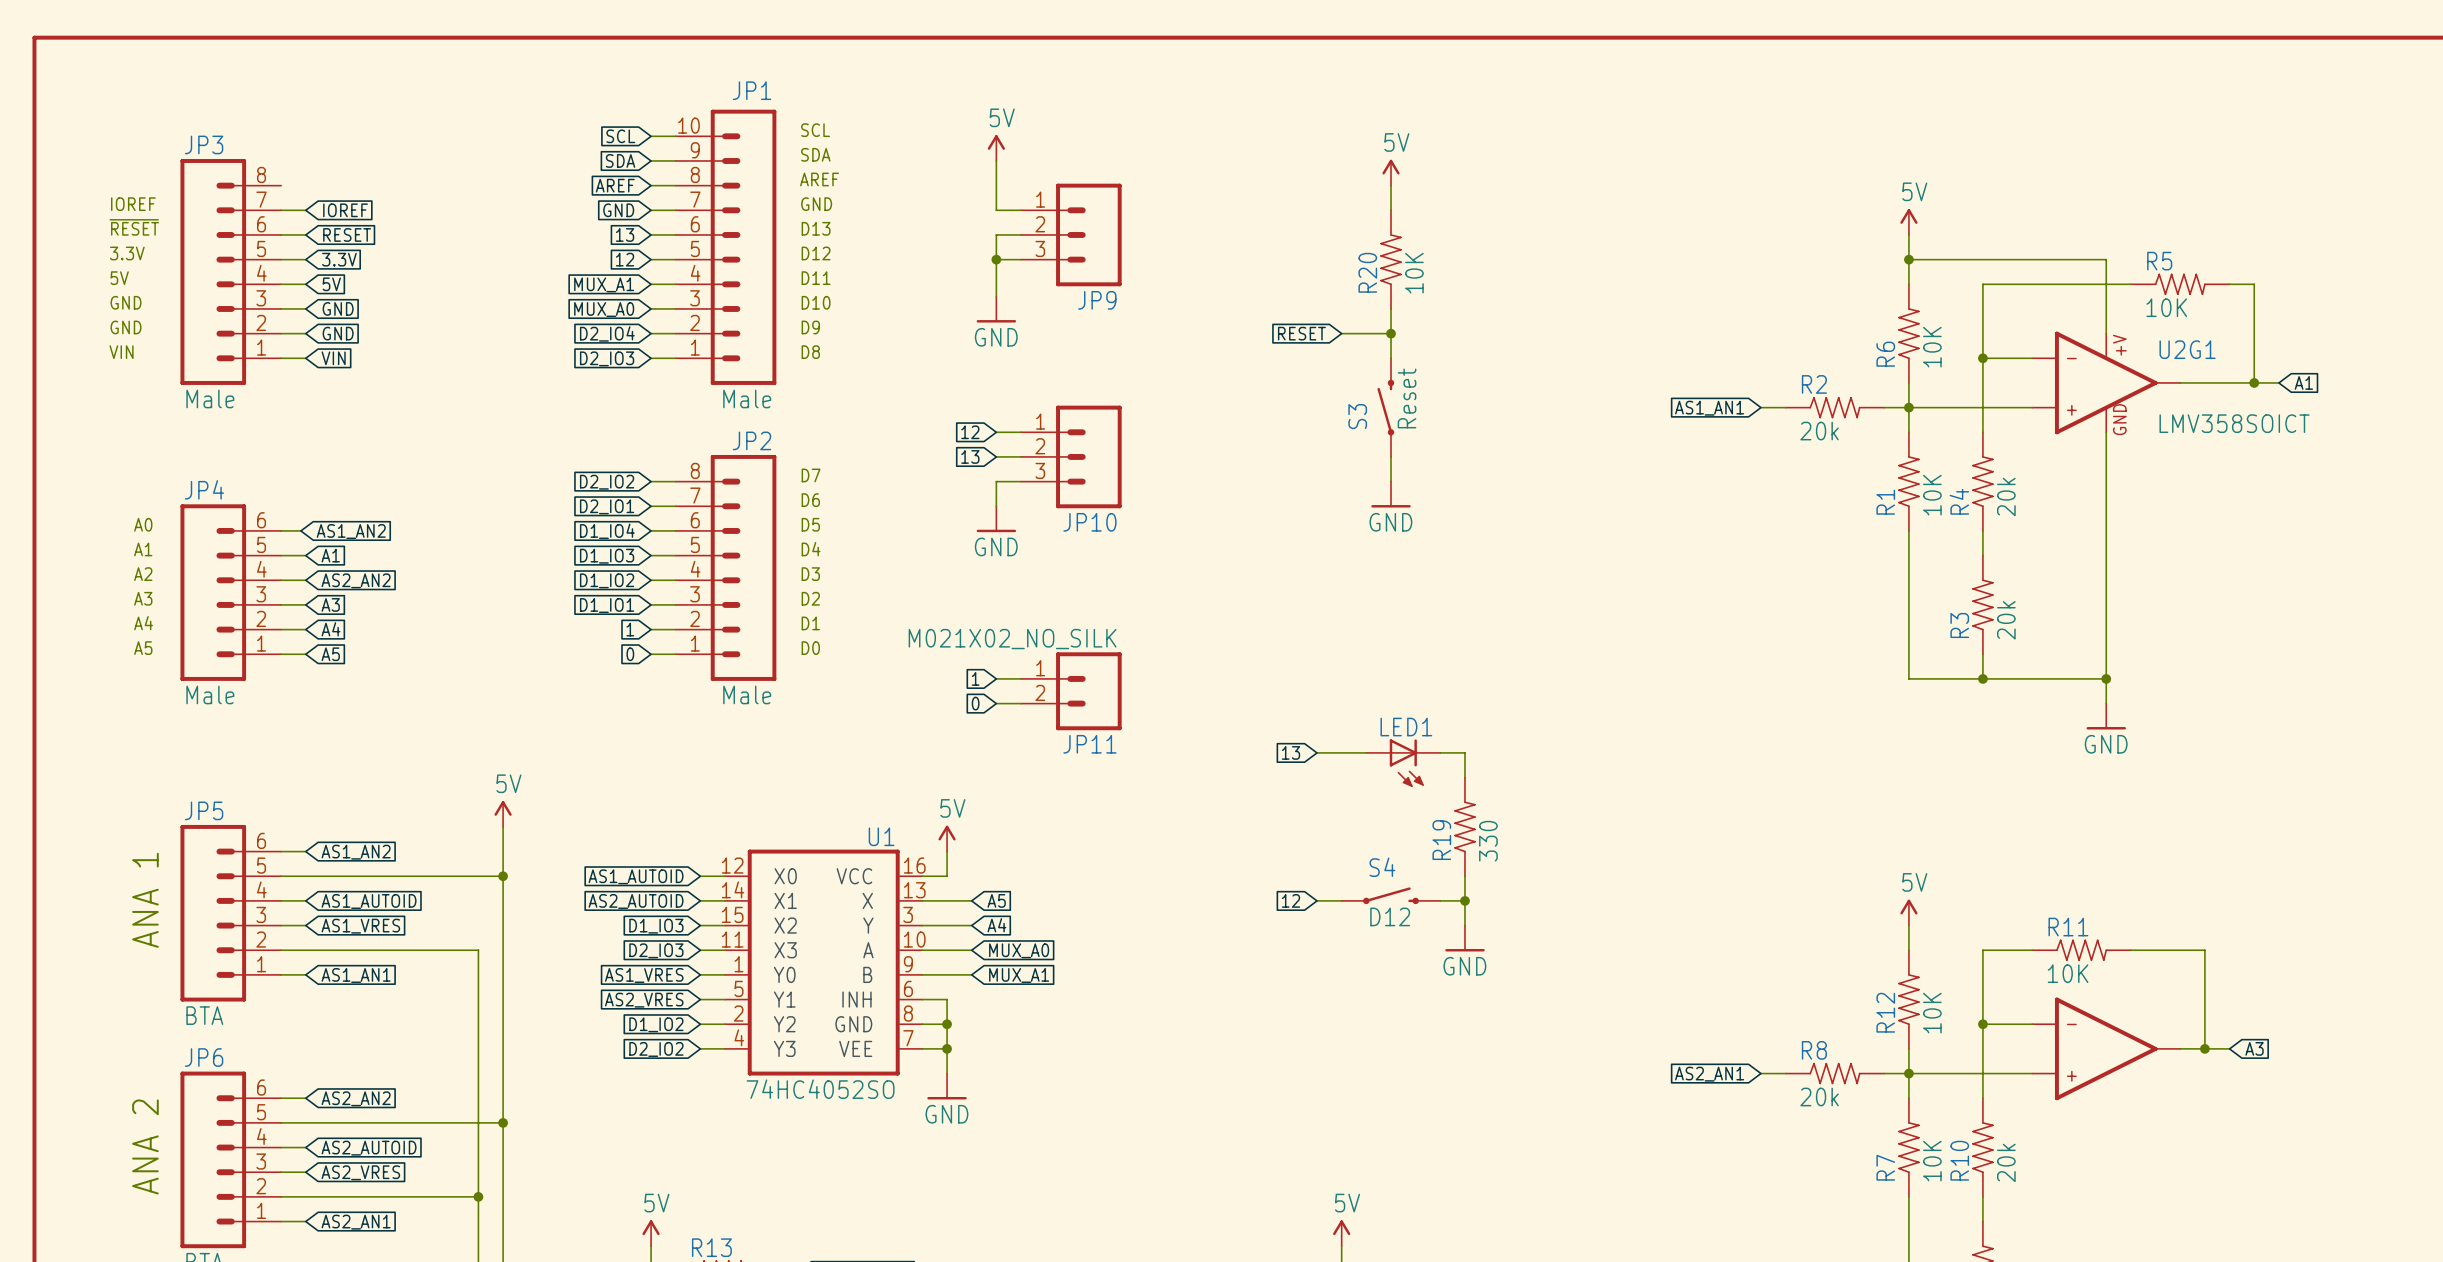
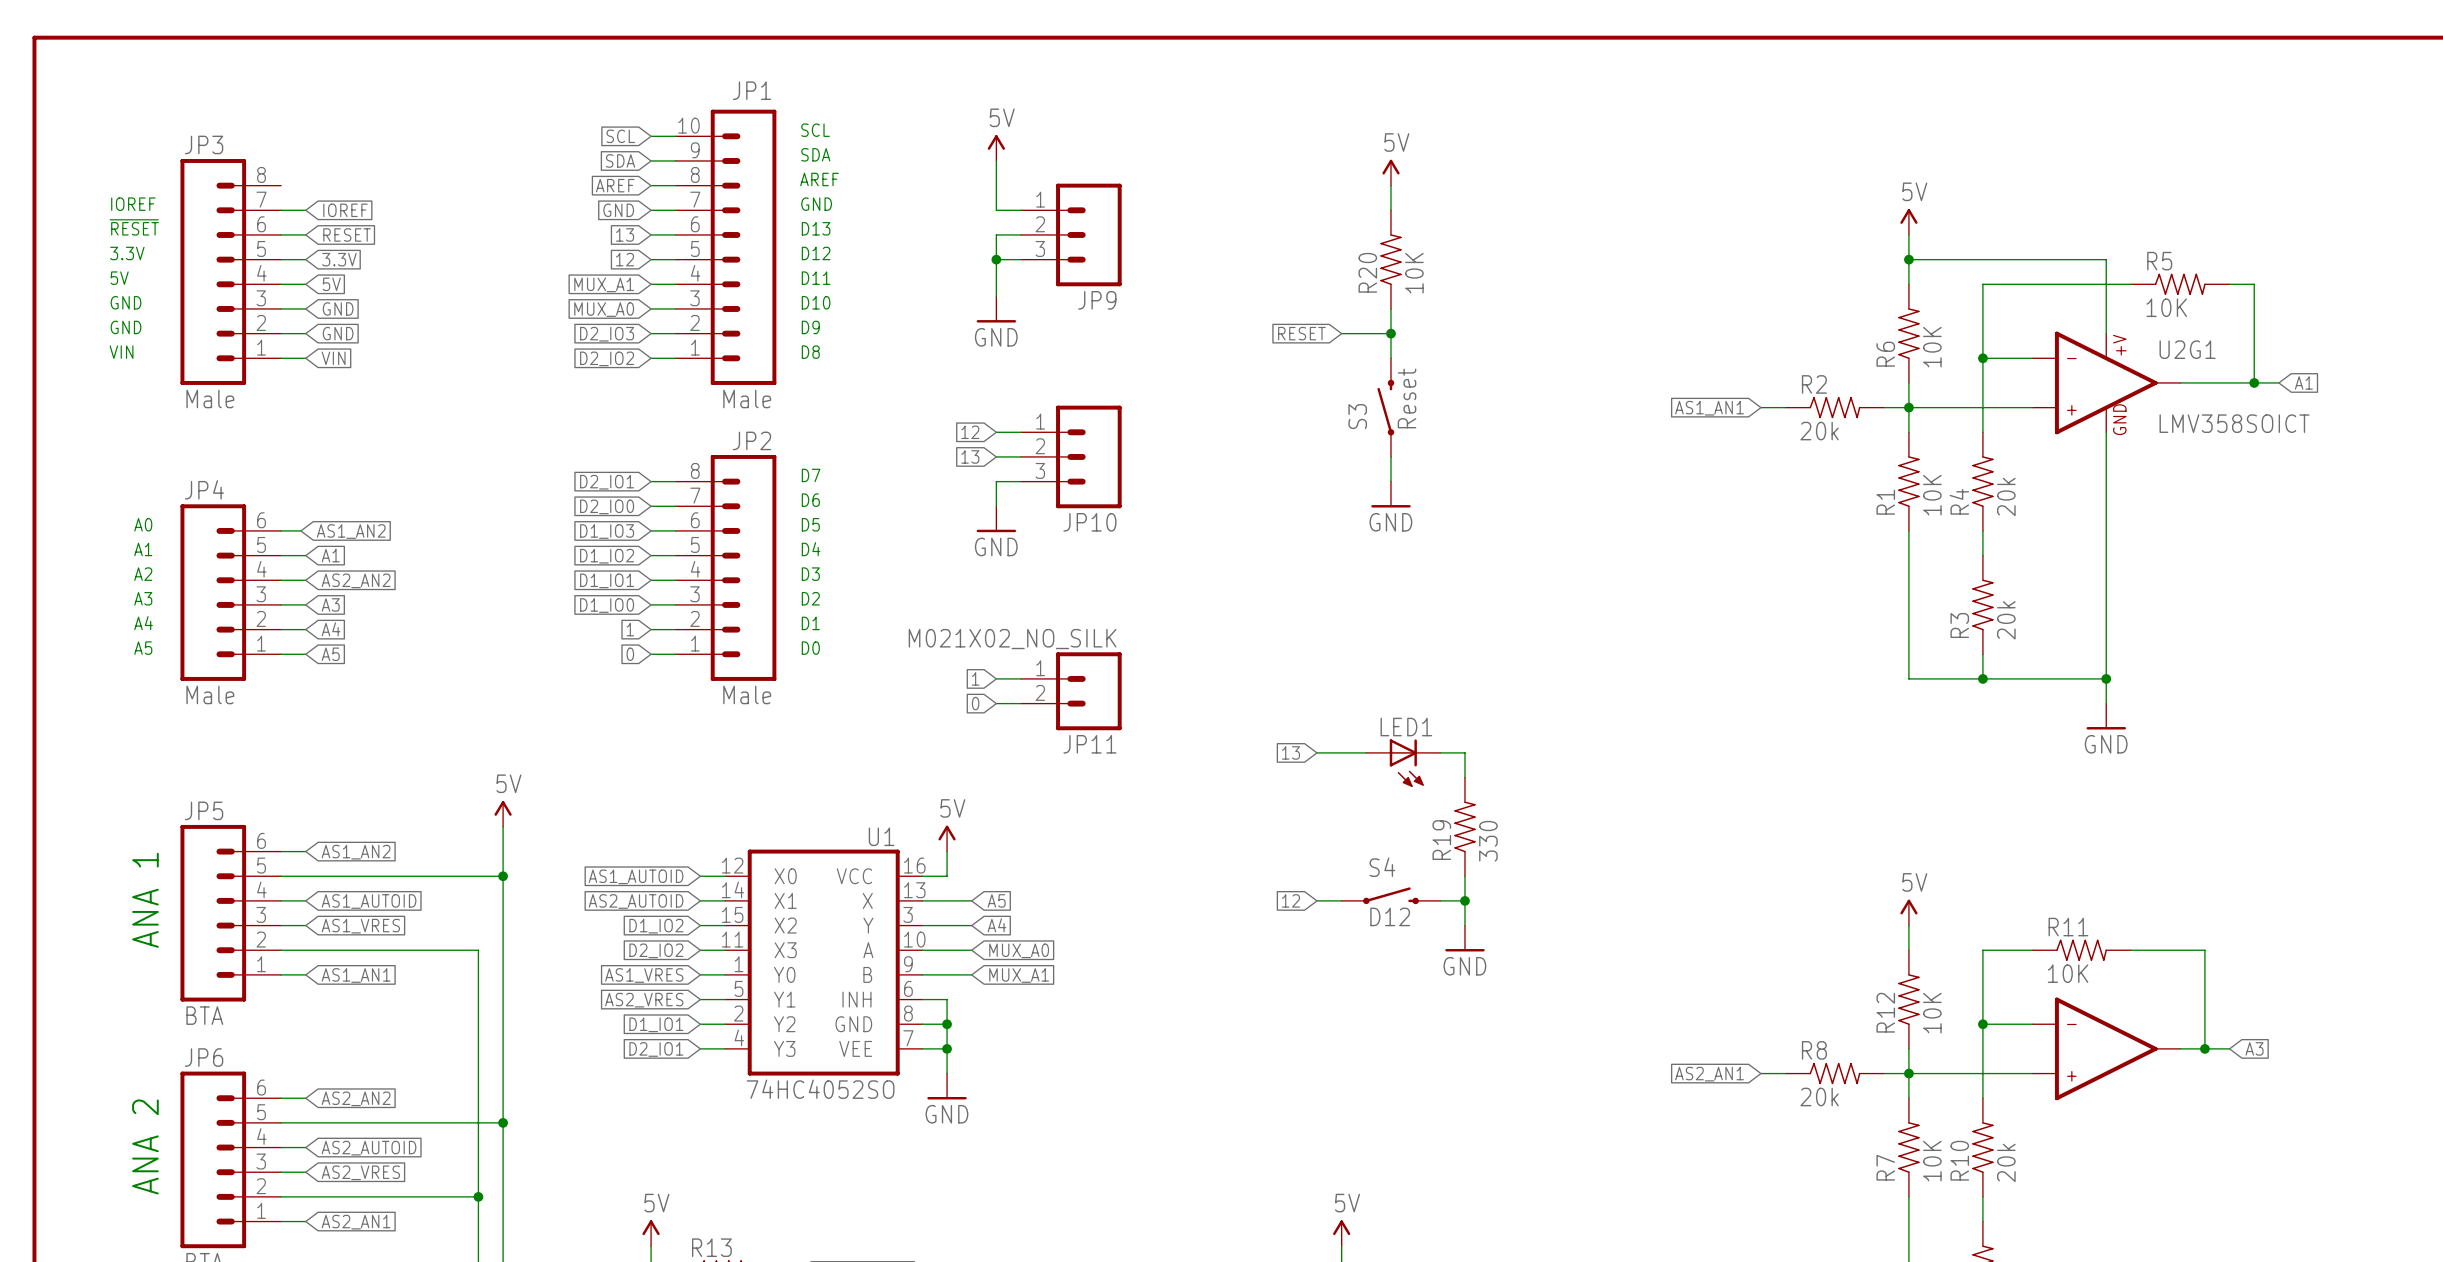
global label: D2_IO4 (607, 333) -> D2_IO3 (607, 334)
global label: D2_IO3 (607, 358) -> D2_IO2 (607, 358)
global label: D2_IO2 (607, 482) -> D2_IO1 (607, 482)
global label: D2_IO1 (607, 506) -> D2_IO0 (607, 506)
global label: D1_IO4 (607, 531) -> D1_IO3 (607, 531)
global label: D1_IO3 (607, 556) -> D1_IO2 (607, 556)
global label: D1_IO2 (607, 580) -> D1_IO1 (607, 580)
global label: D1_IO1 (607, 605) -> D1_IO0 (607, 605)
global label: D1_IO3 (656, 926) -> D1_IO2 (656, 926)
global label: D2_IO3 (656, 950) -> D2_IO2 (656, 950)
global label: D1_IO2 (656, 1024) -> D1_IO1 (656, 1024)
global label: D2_IO2 (656, 1049) -> D2_IO1 (656, 1049)

